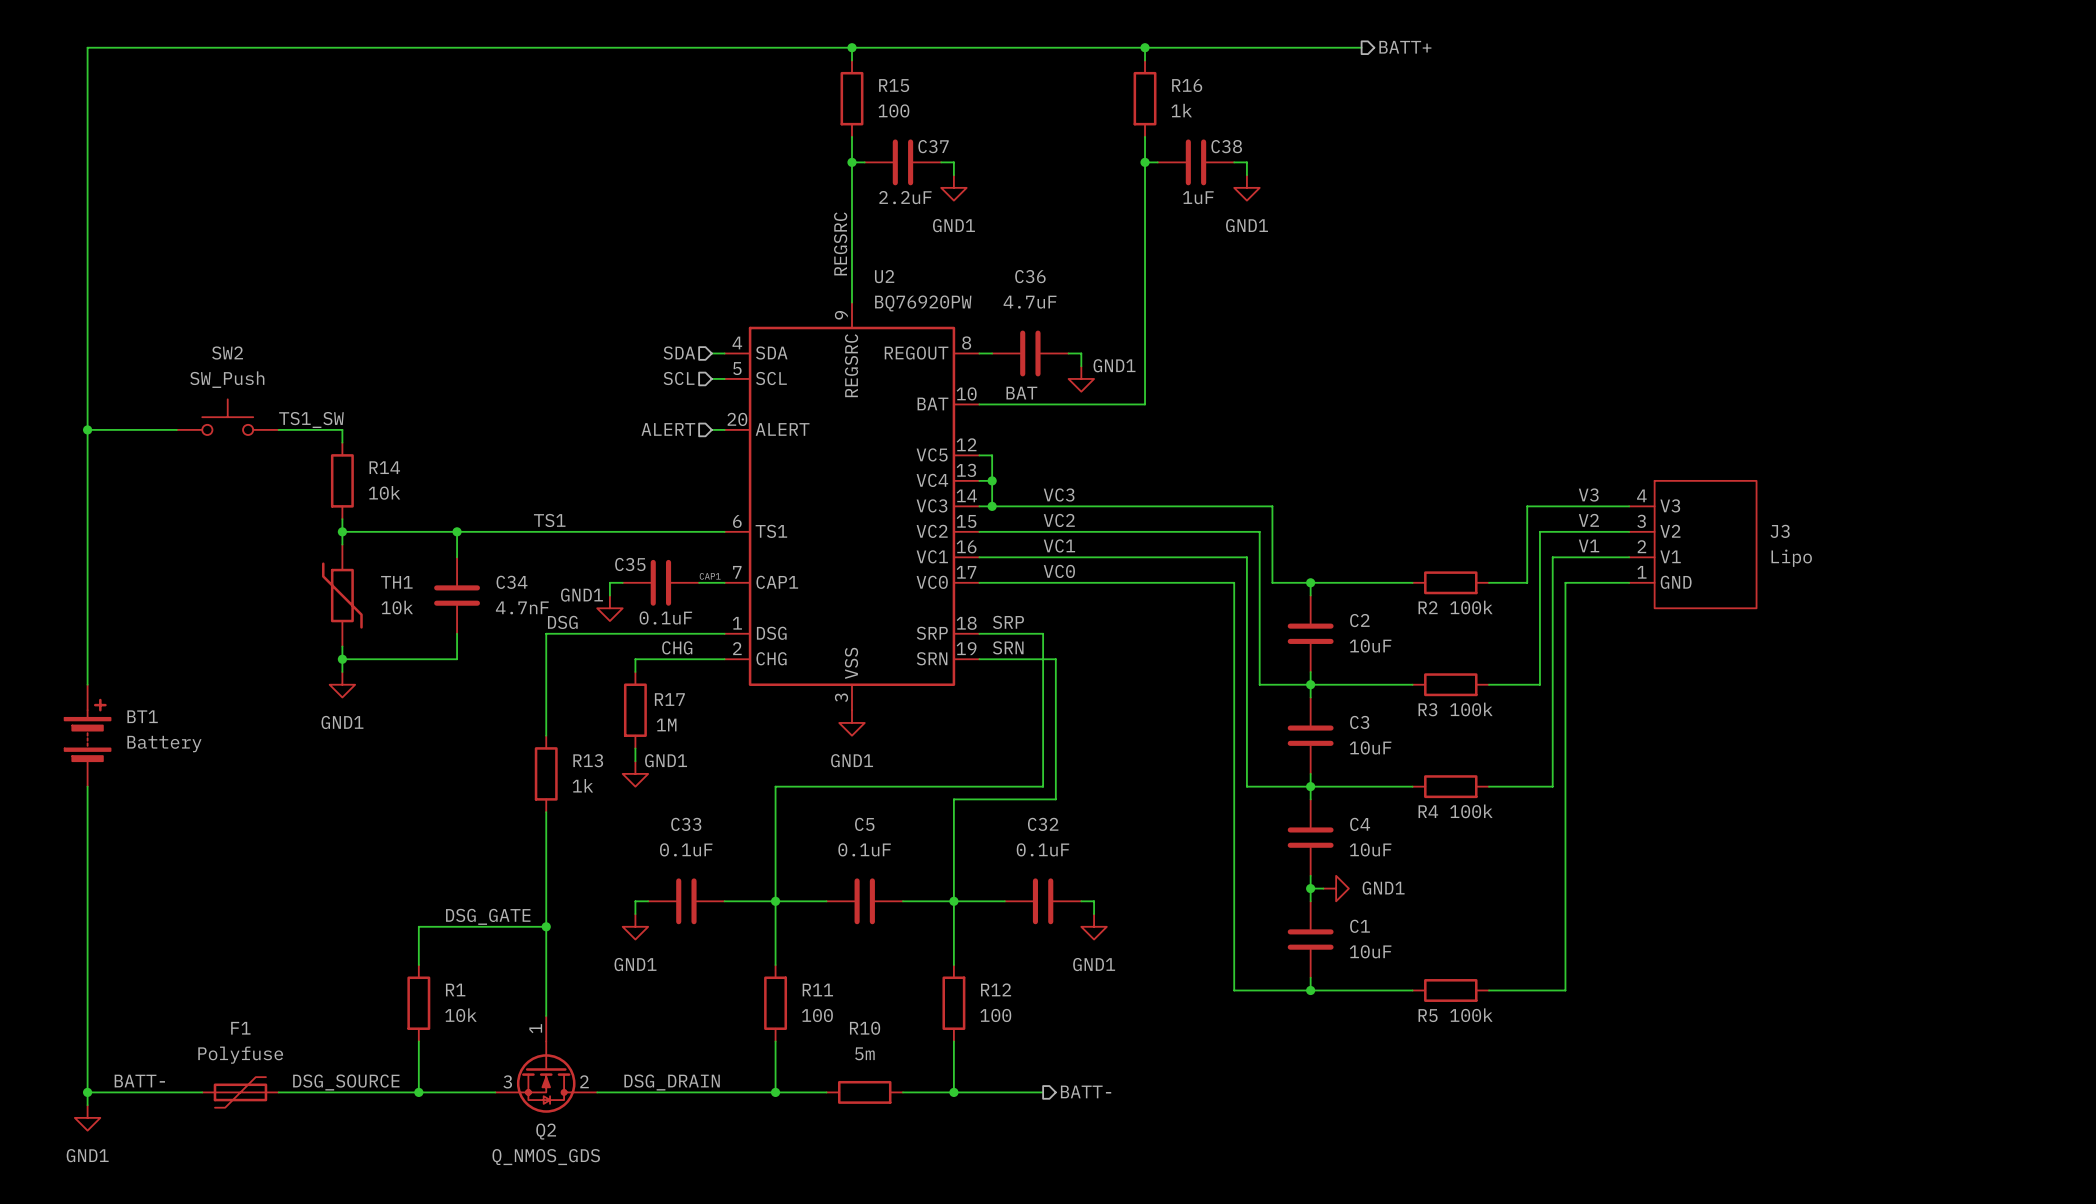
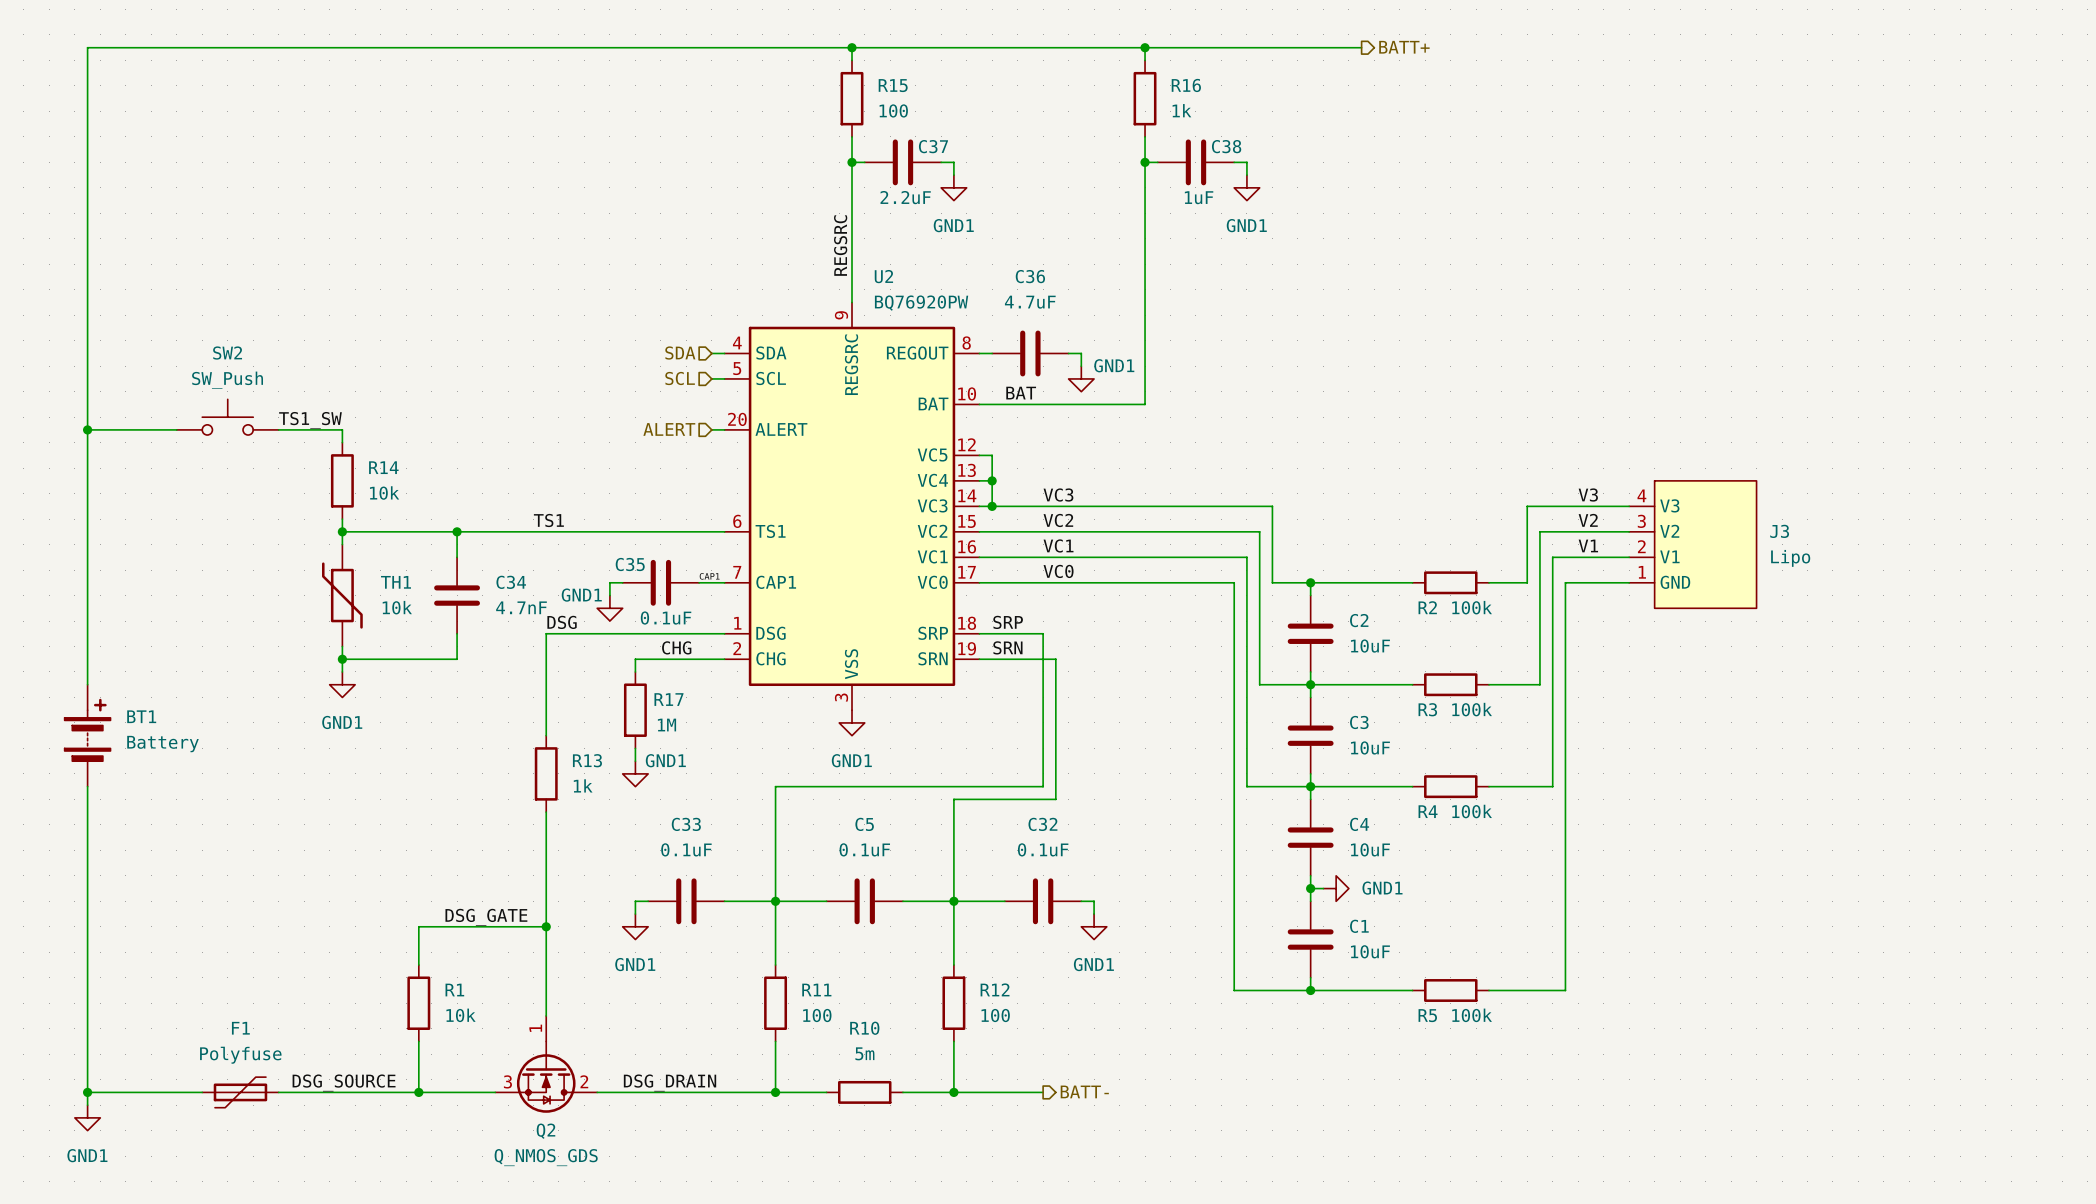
label: BATT- (139, 1081) -> none

